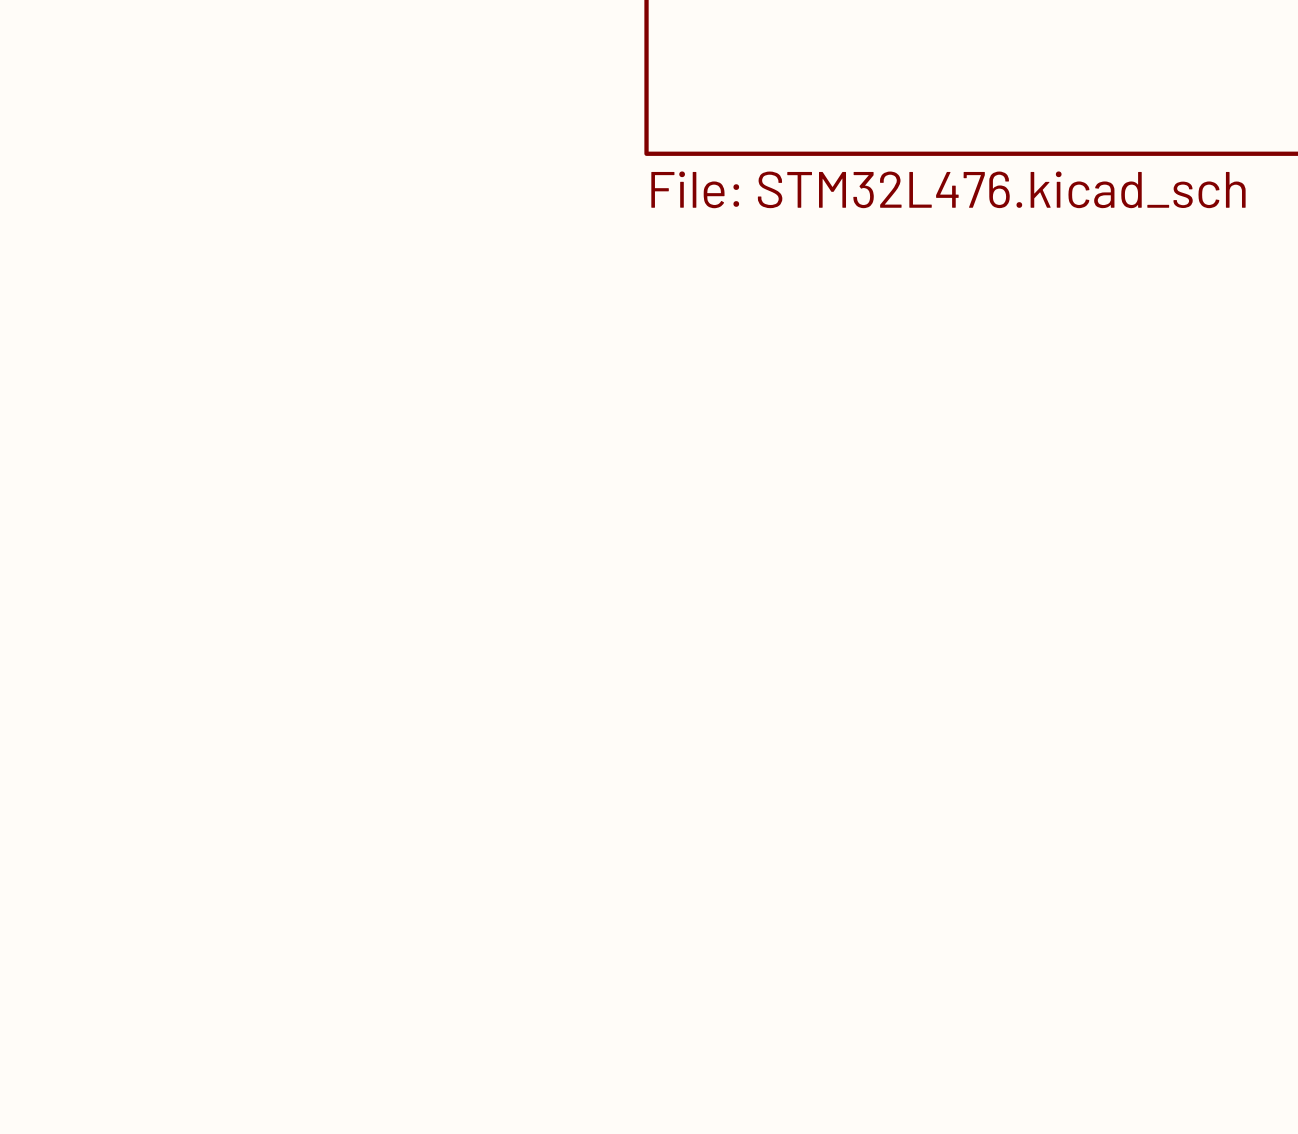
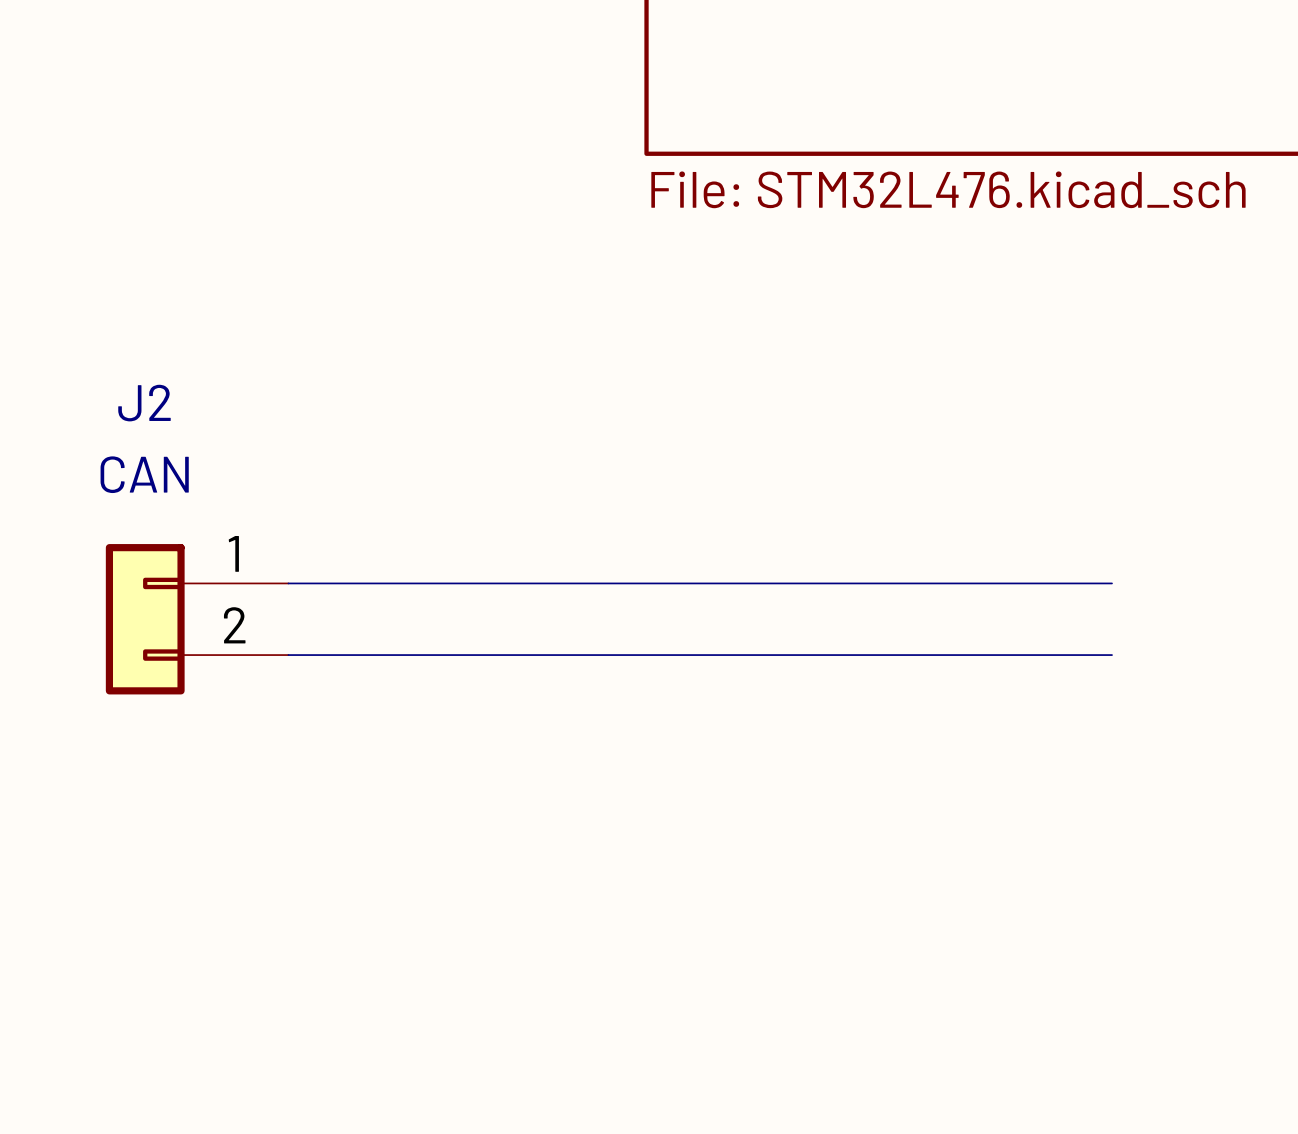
wire: none -> (288, 583) (1112, 583)
J2: none -> CAN (197, 619)
wire: none -> (288, 655) (1112, 655)

